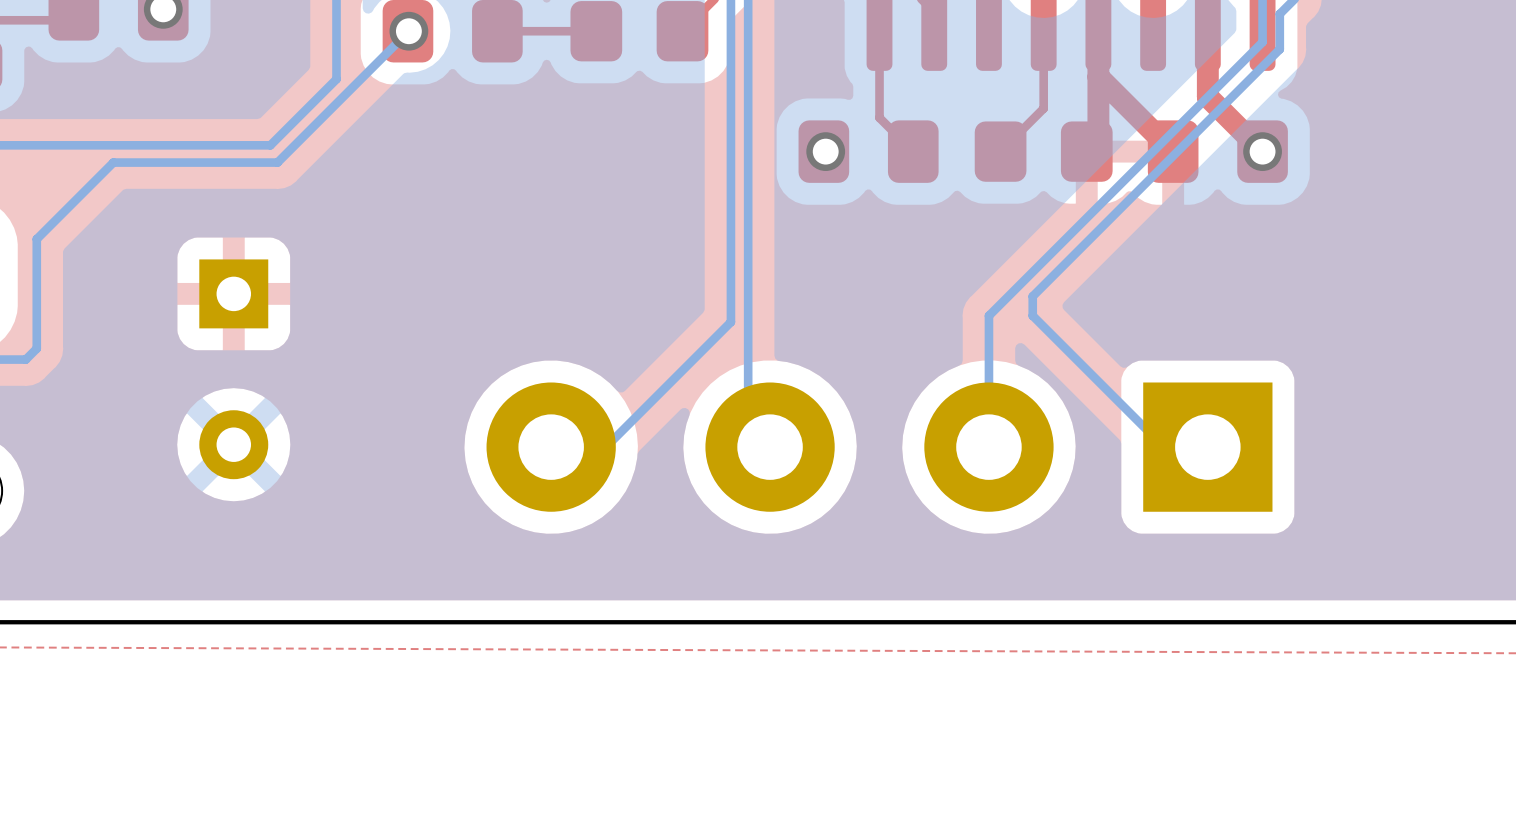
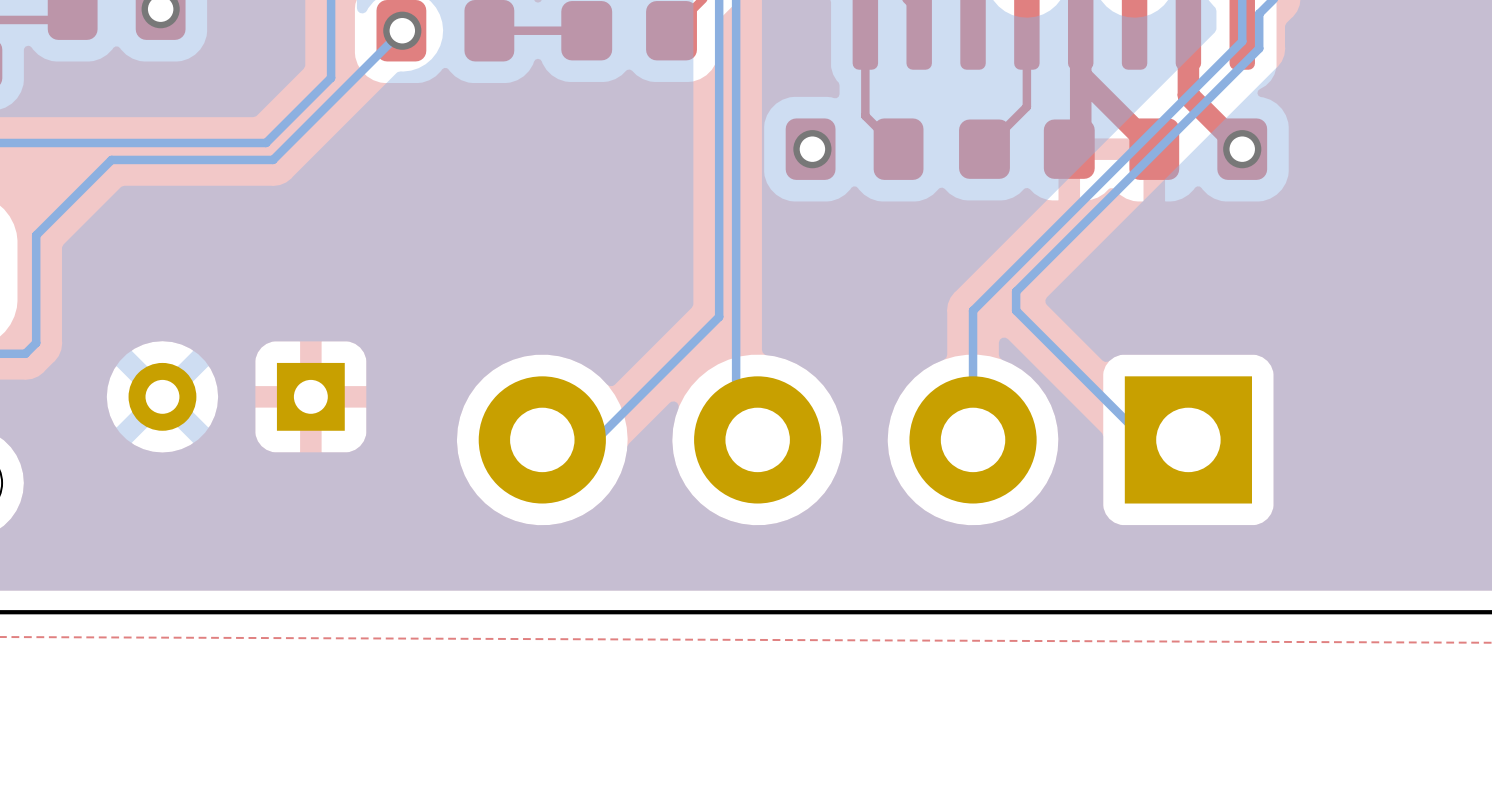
part rotation: 0° (233, 369) -> 90° clockwise (236, 396)

